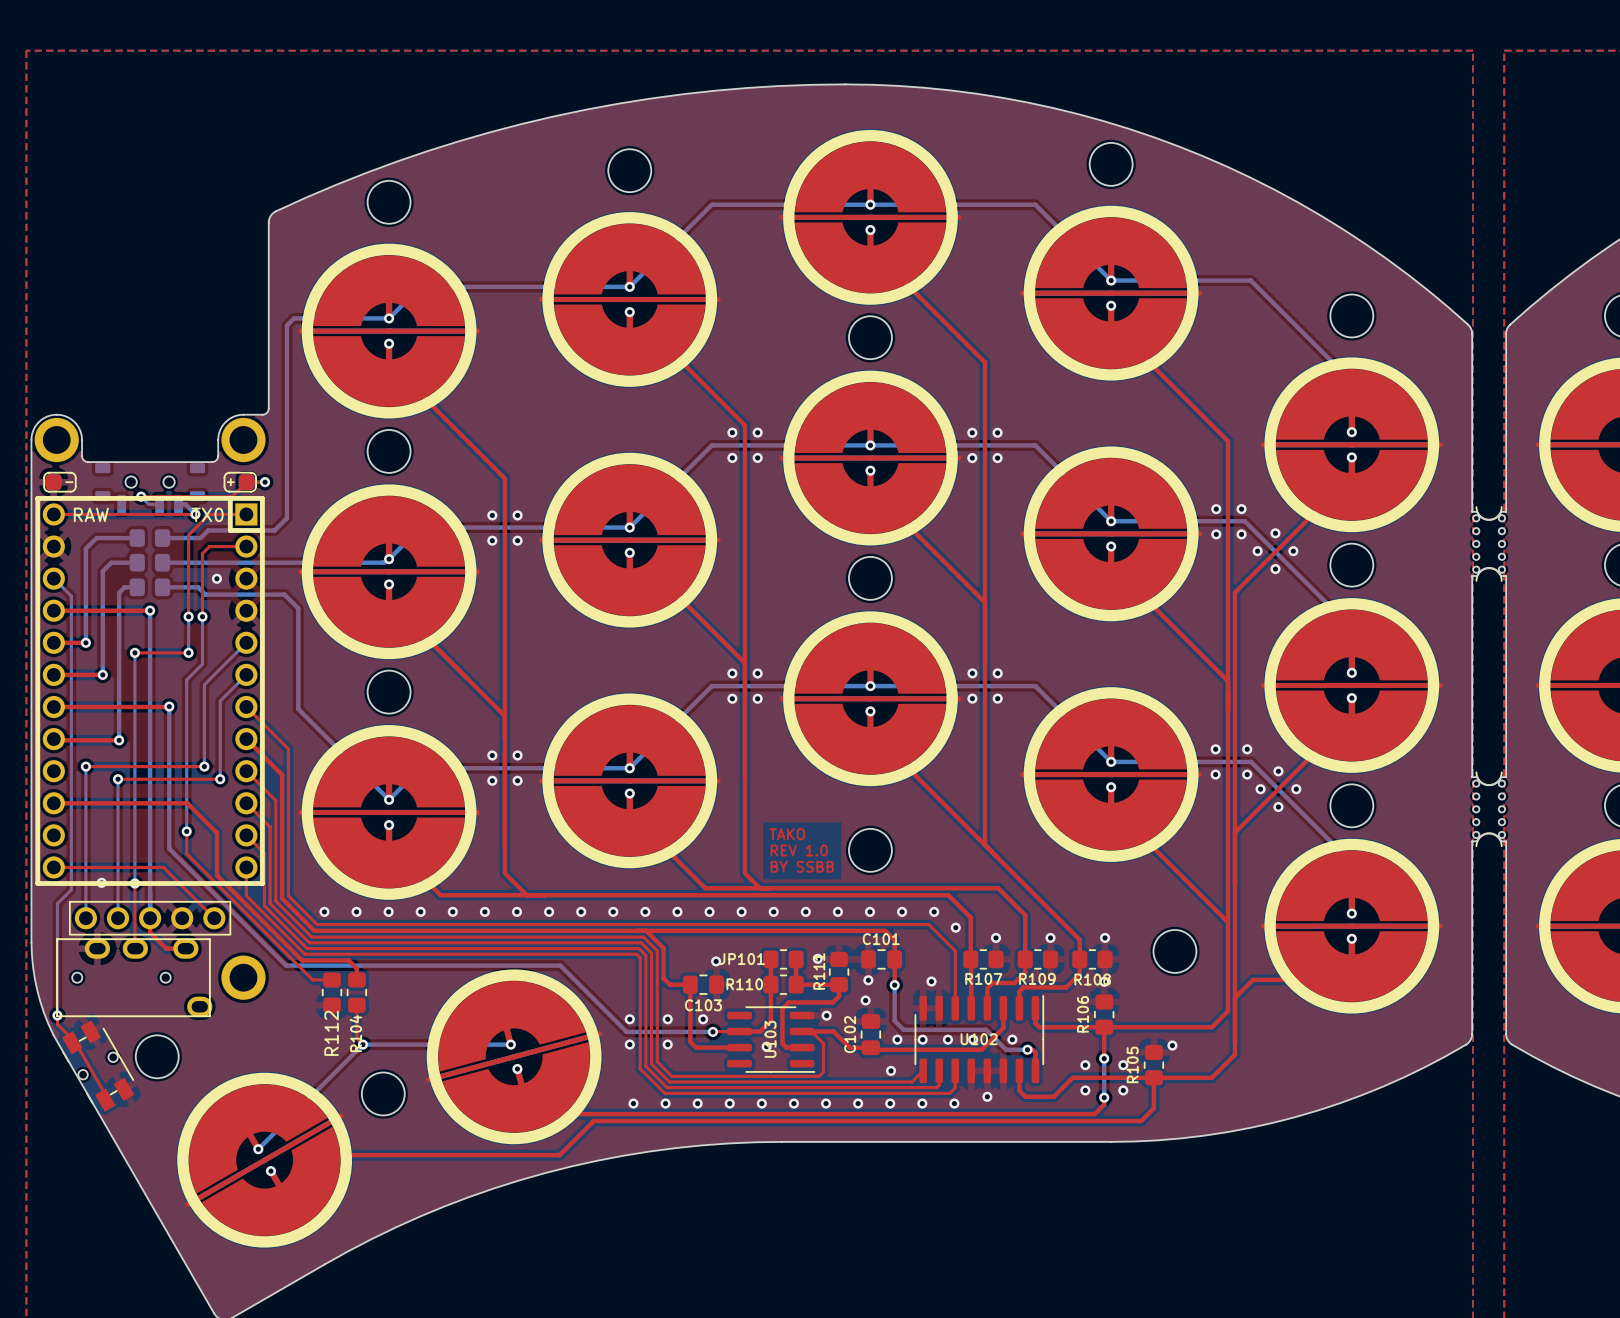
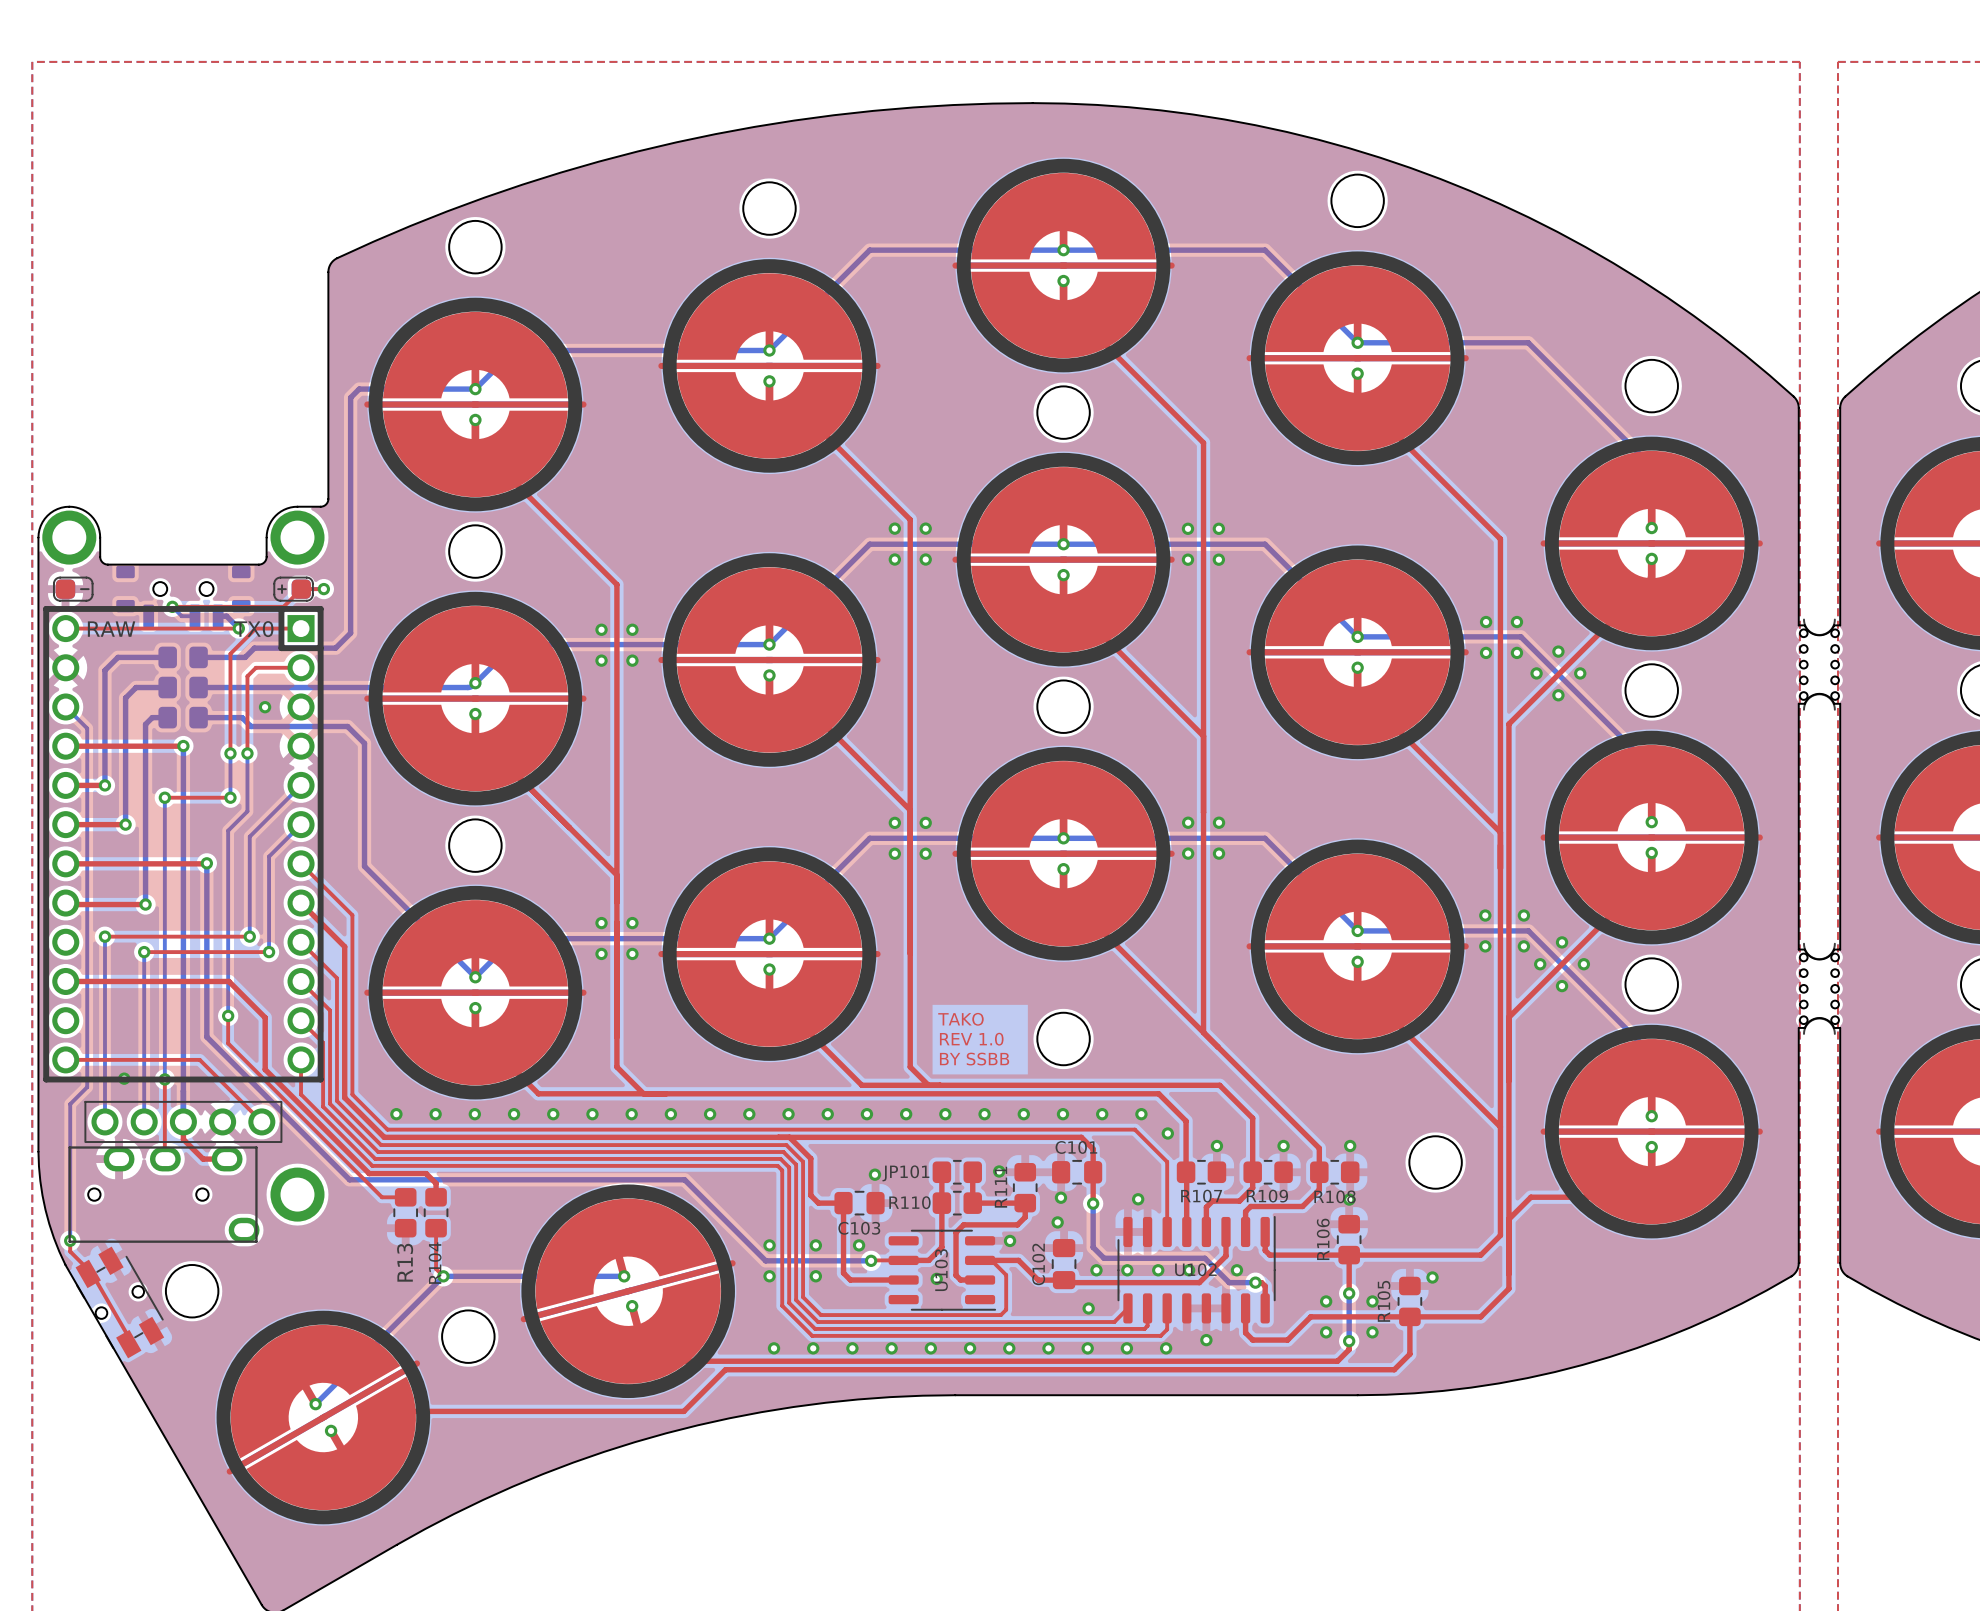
R112 name: R112 (331, 1033) -> R13 (405, 1262)

